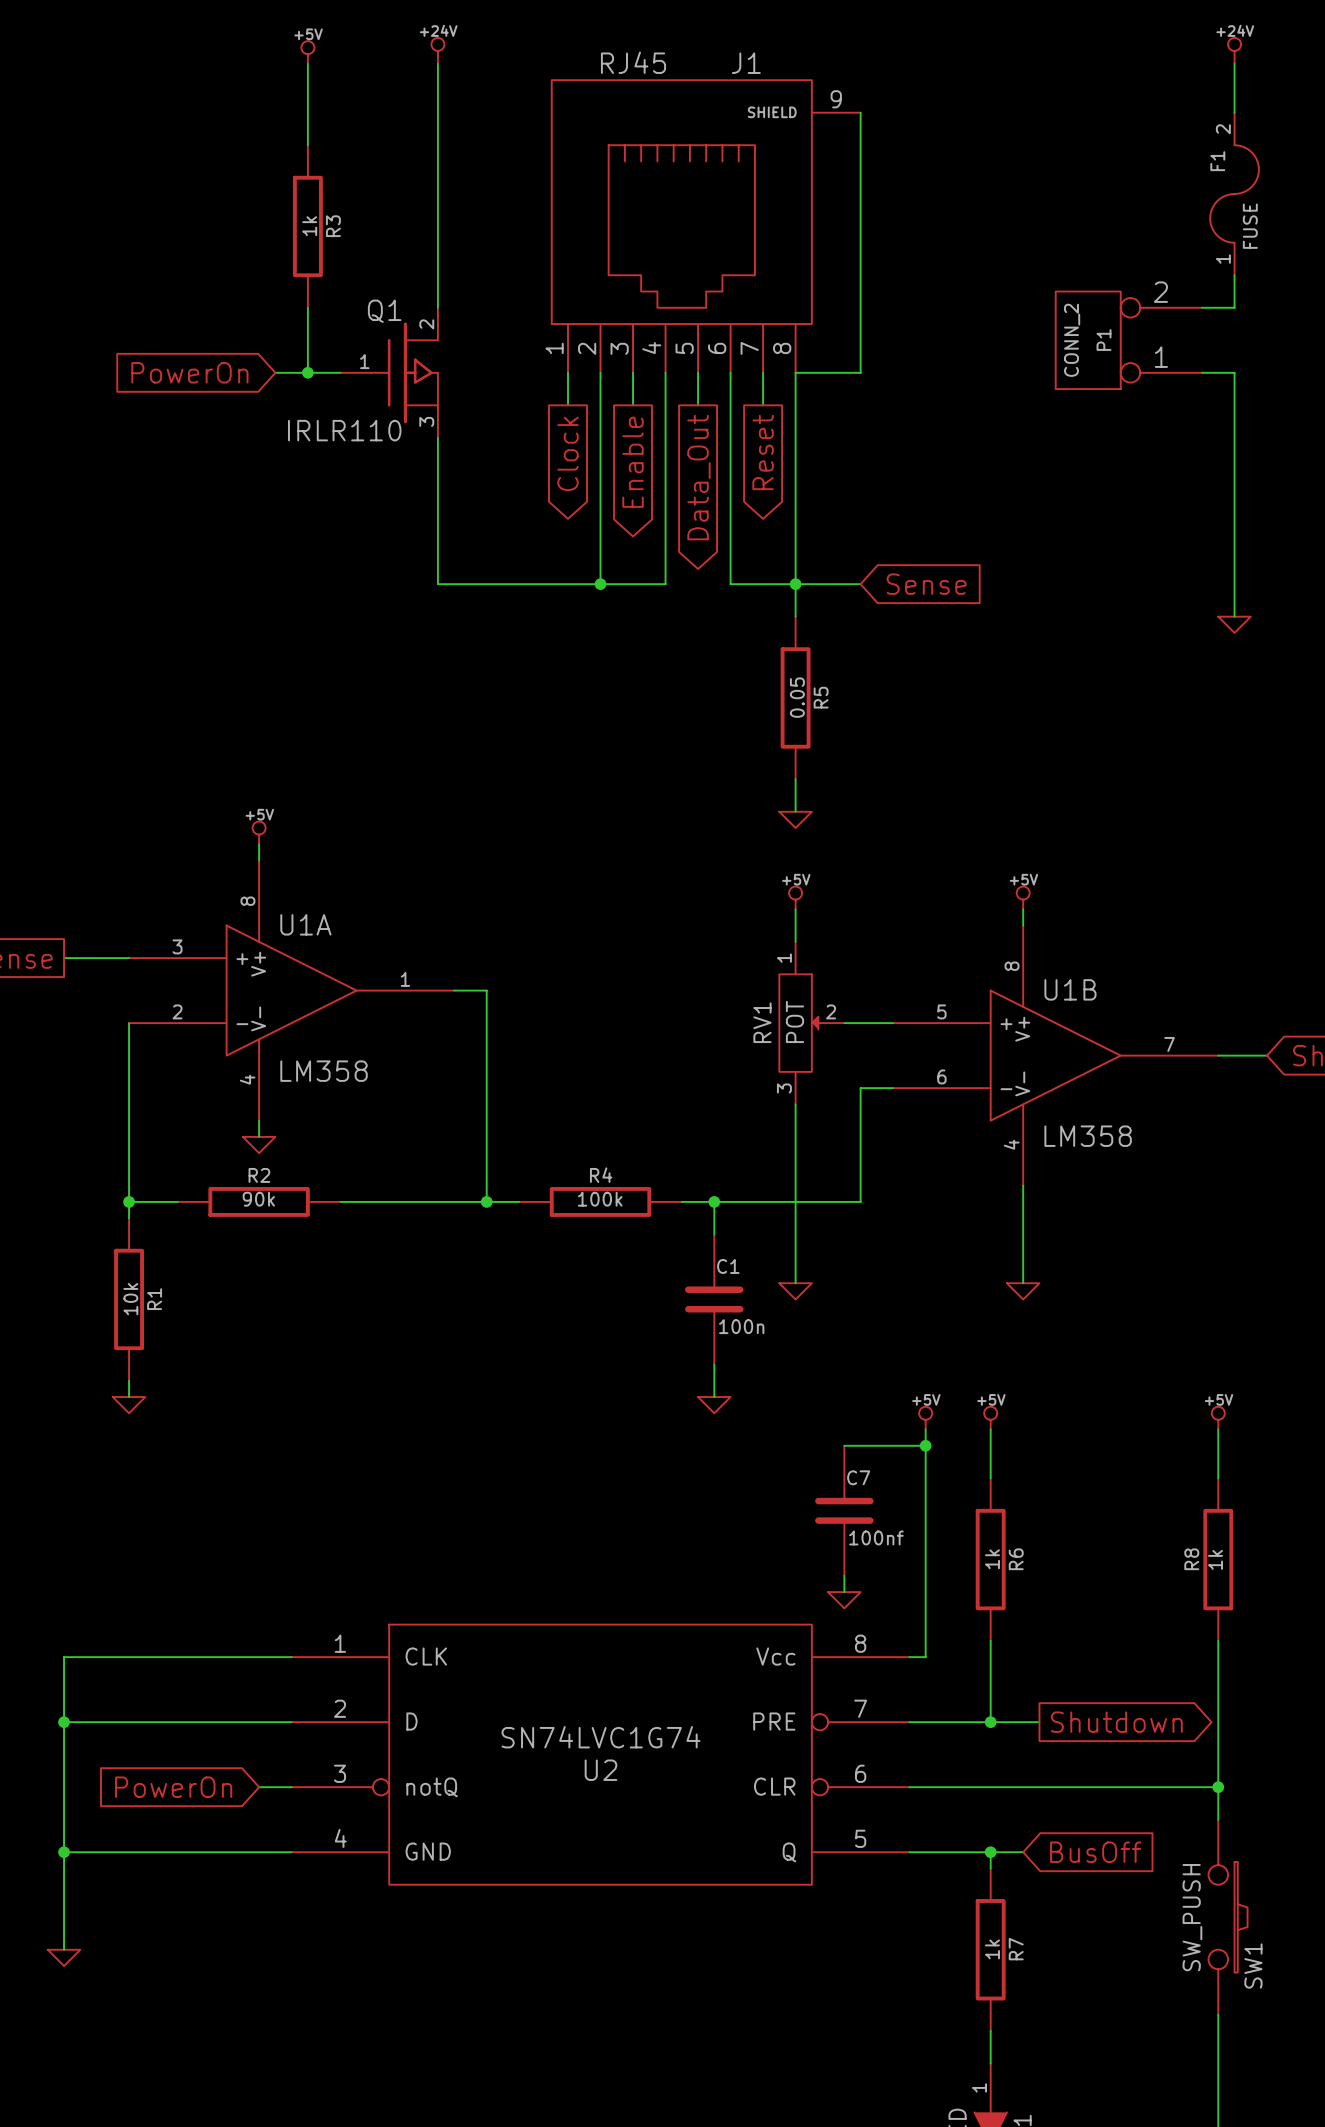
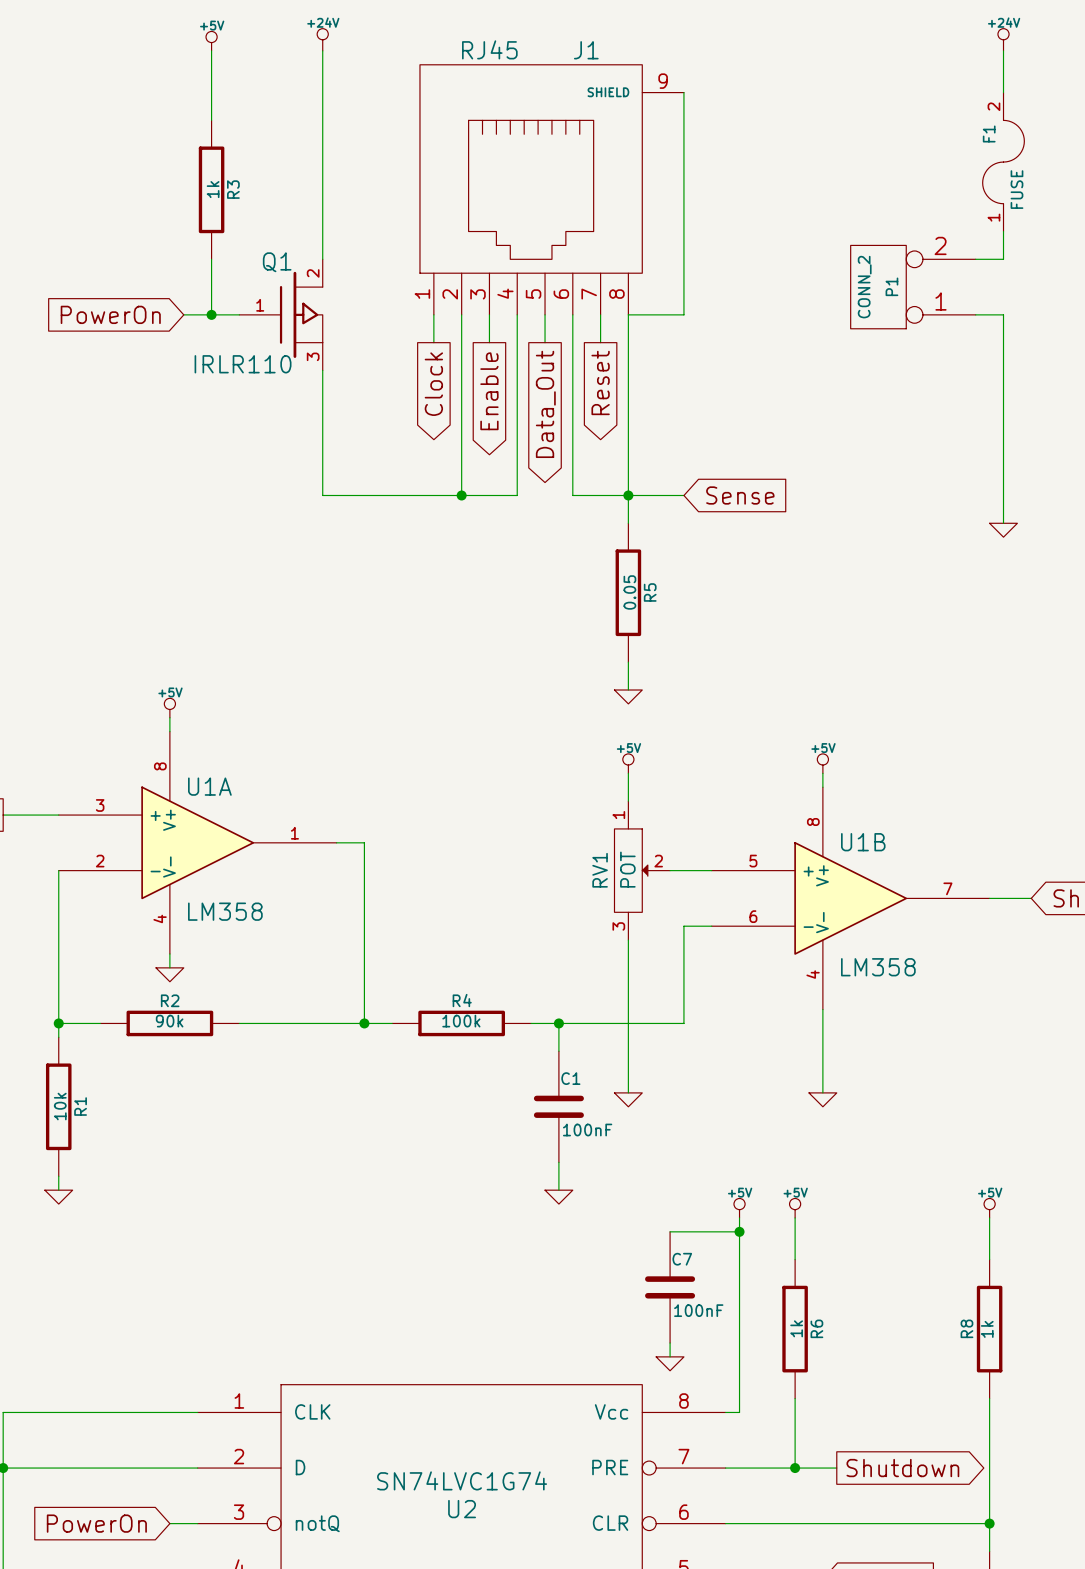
C1 value: 100n (741, 1326) -> 100nF (587, 1130)
C7 value: 100nf (876, 1537) -> 100nF (698, 1310)

